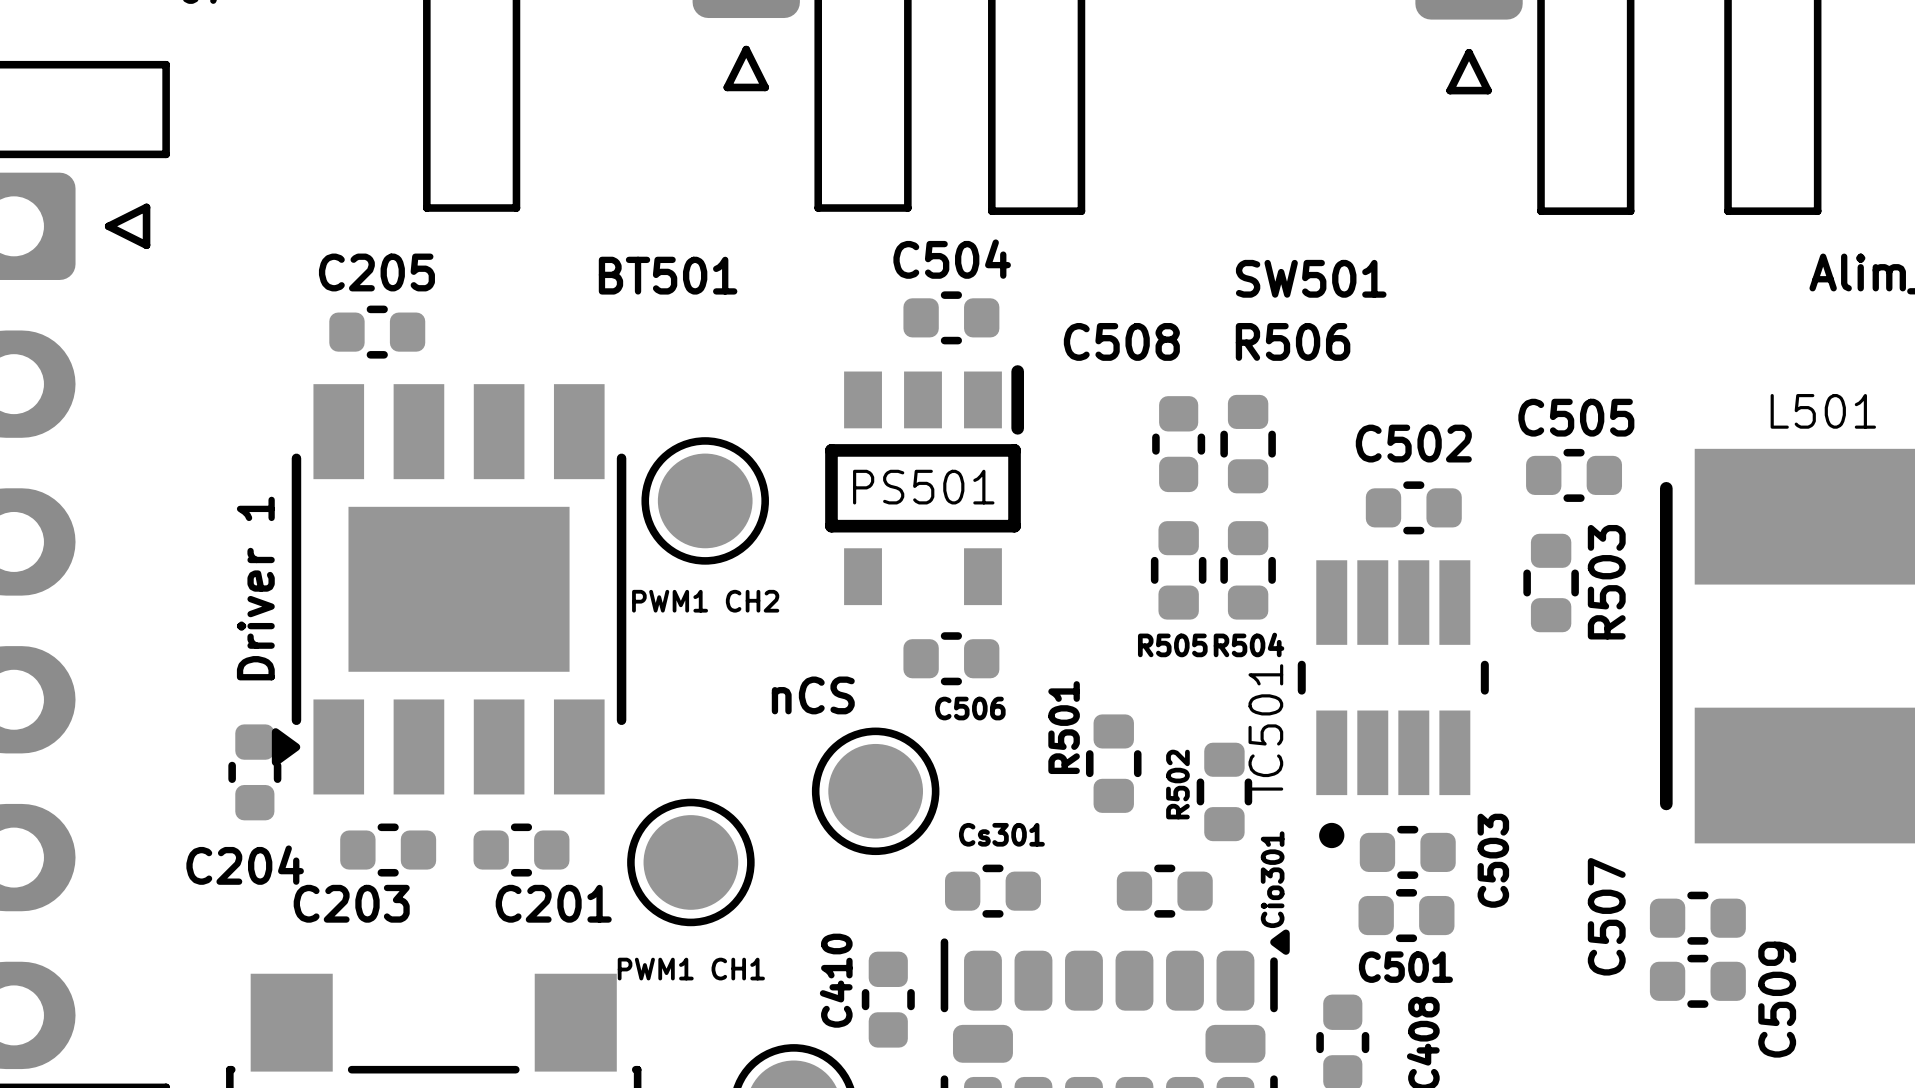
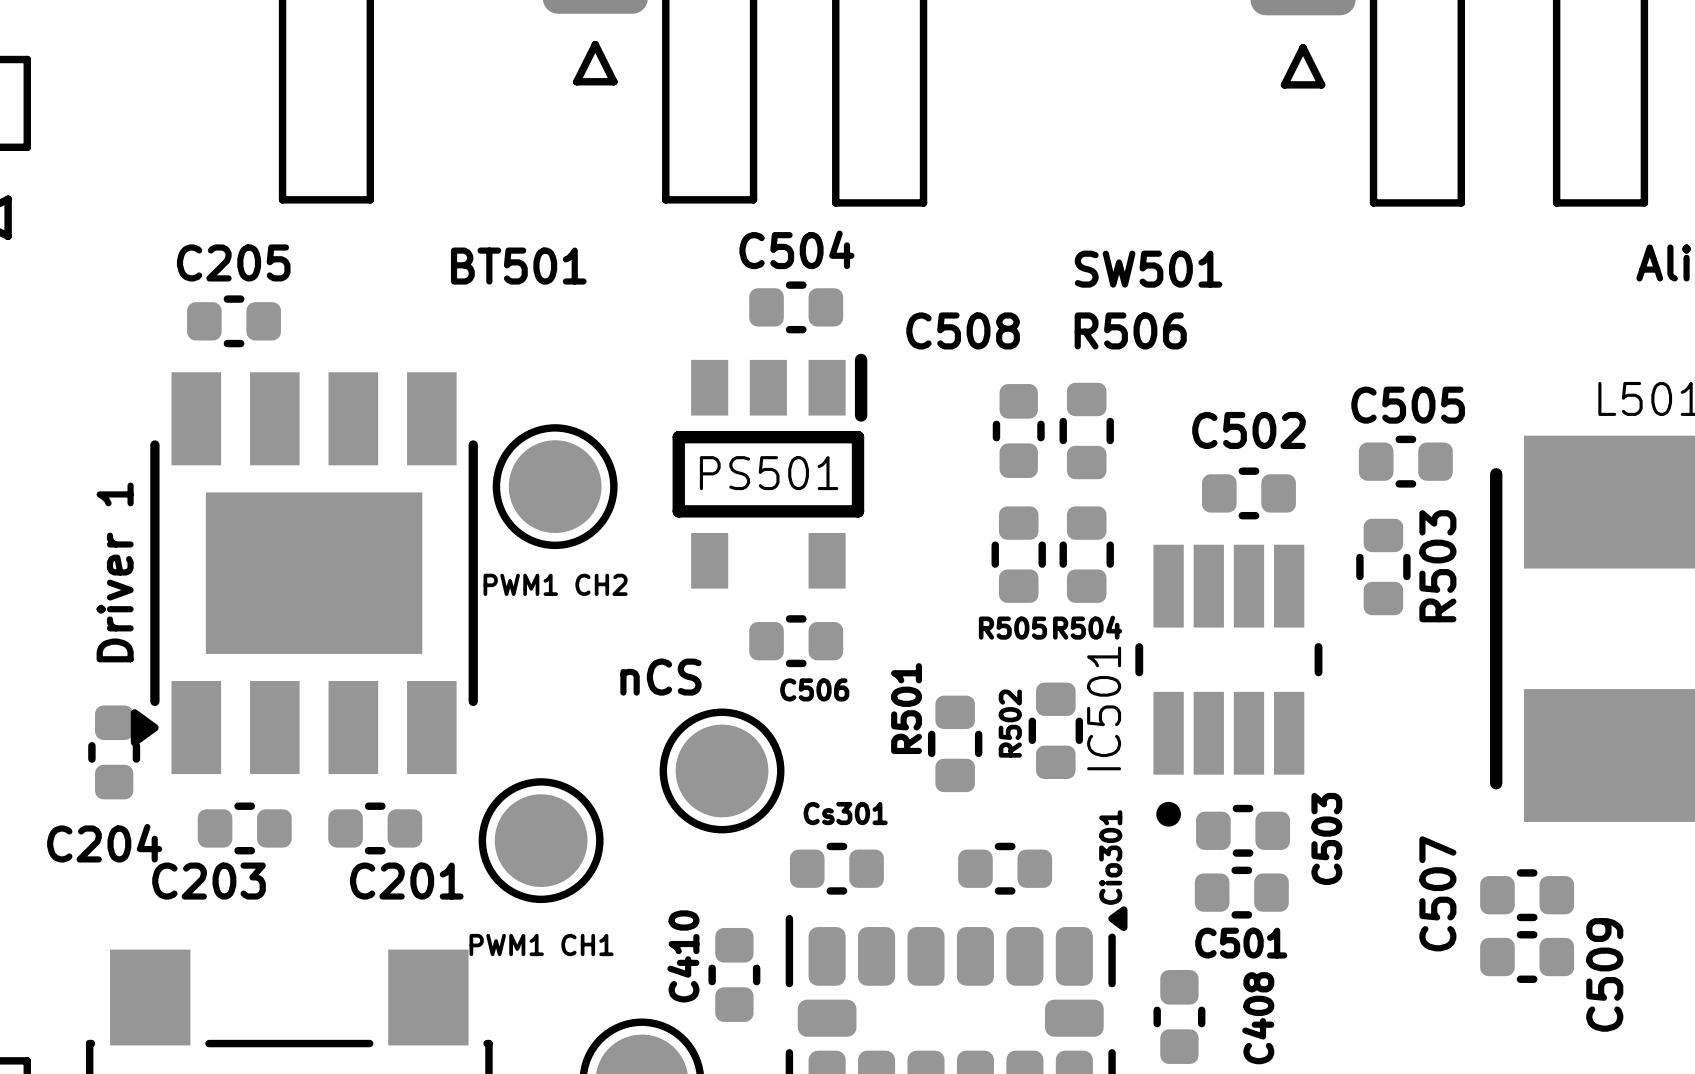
R502 position: (1224, 791) -> (1055, 730)

